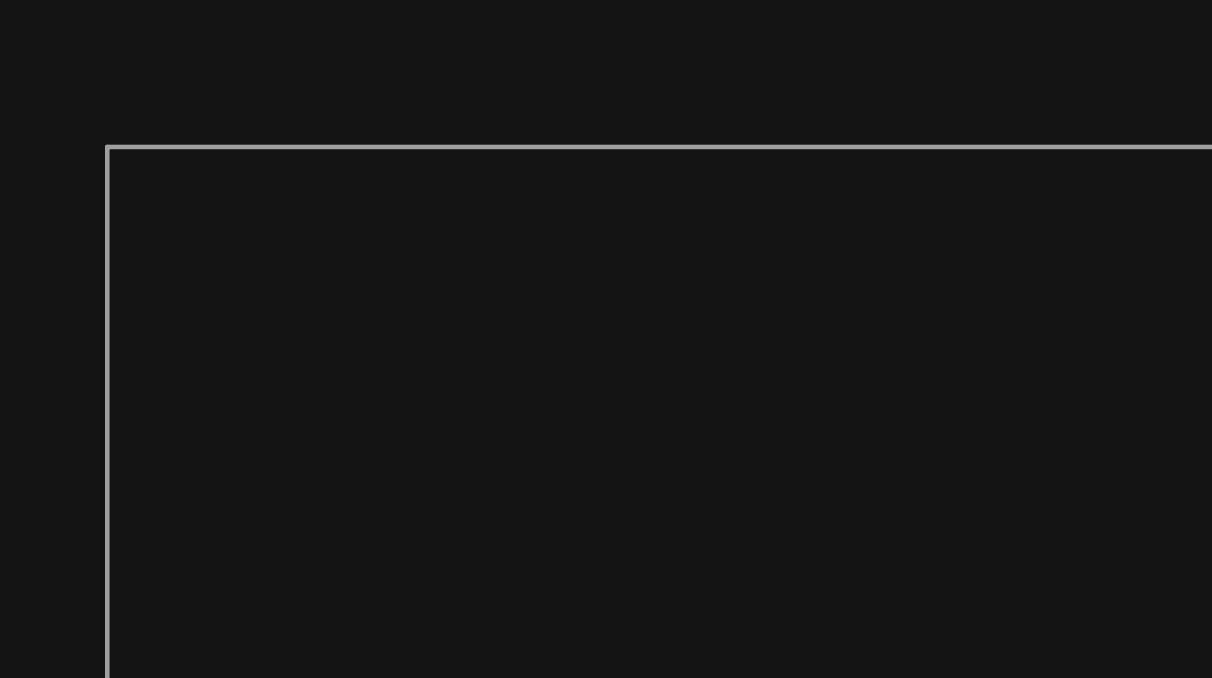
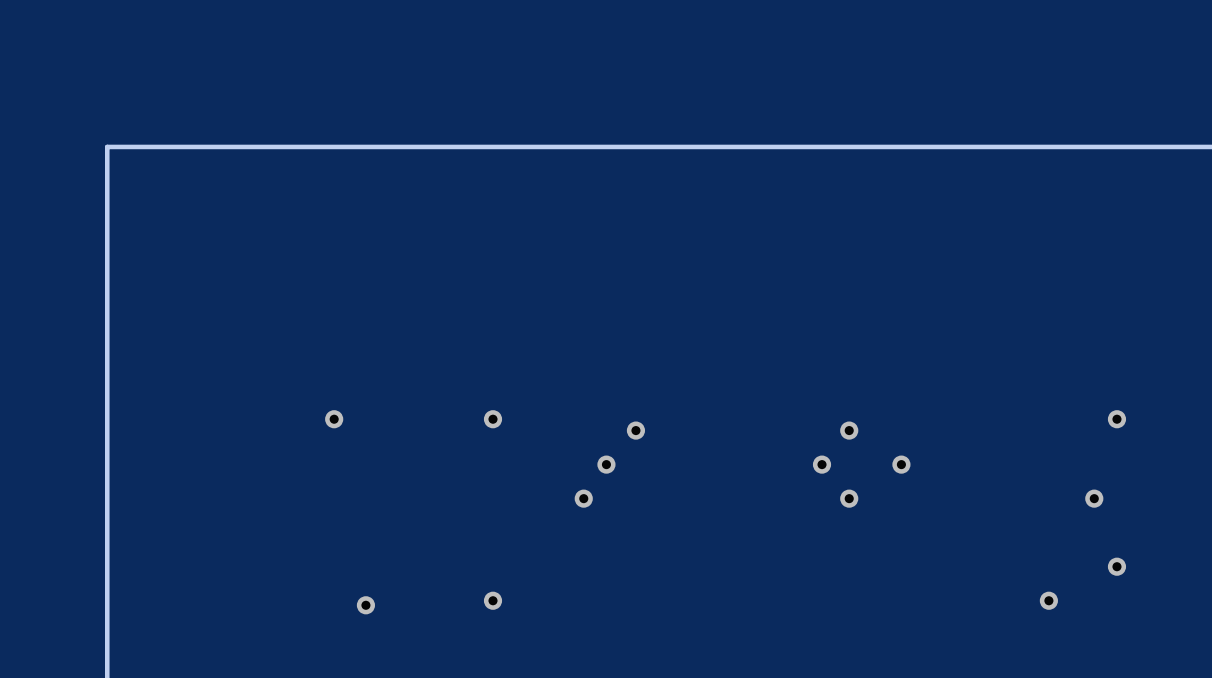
via: none -> (334, 419)
via: none -> (493, 419)
via: none -> (1116, 419)
via: none -> (635, 430)
via: none -> (849, 430)
via: none -> (606, 464)
via: none -> (822, 464)
via: none -> (901, 464)
via: none -> (583, 498)
via: none -> (849, 498)
via: none -> (1094, 498)
via: none -> (1116, 566)
via: none -> (493, 600)
via: none -> (1048, 600)
via: none -> (365, 605)

